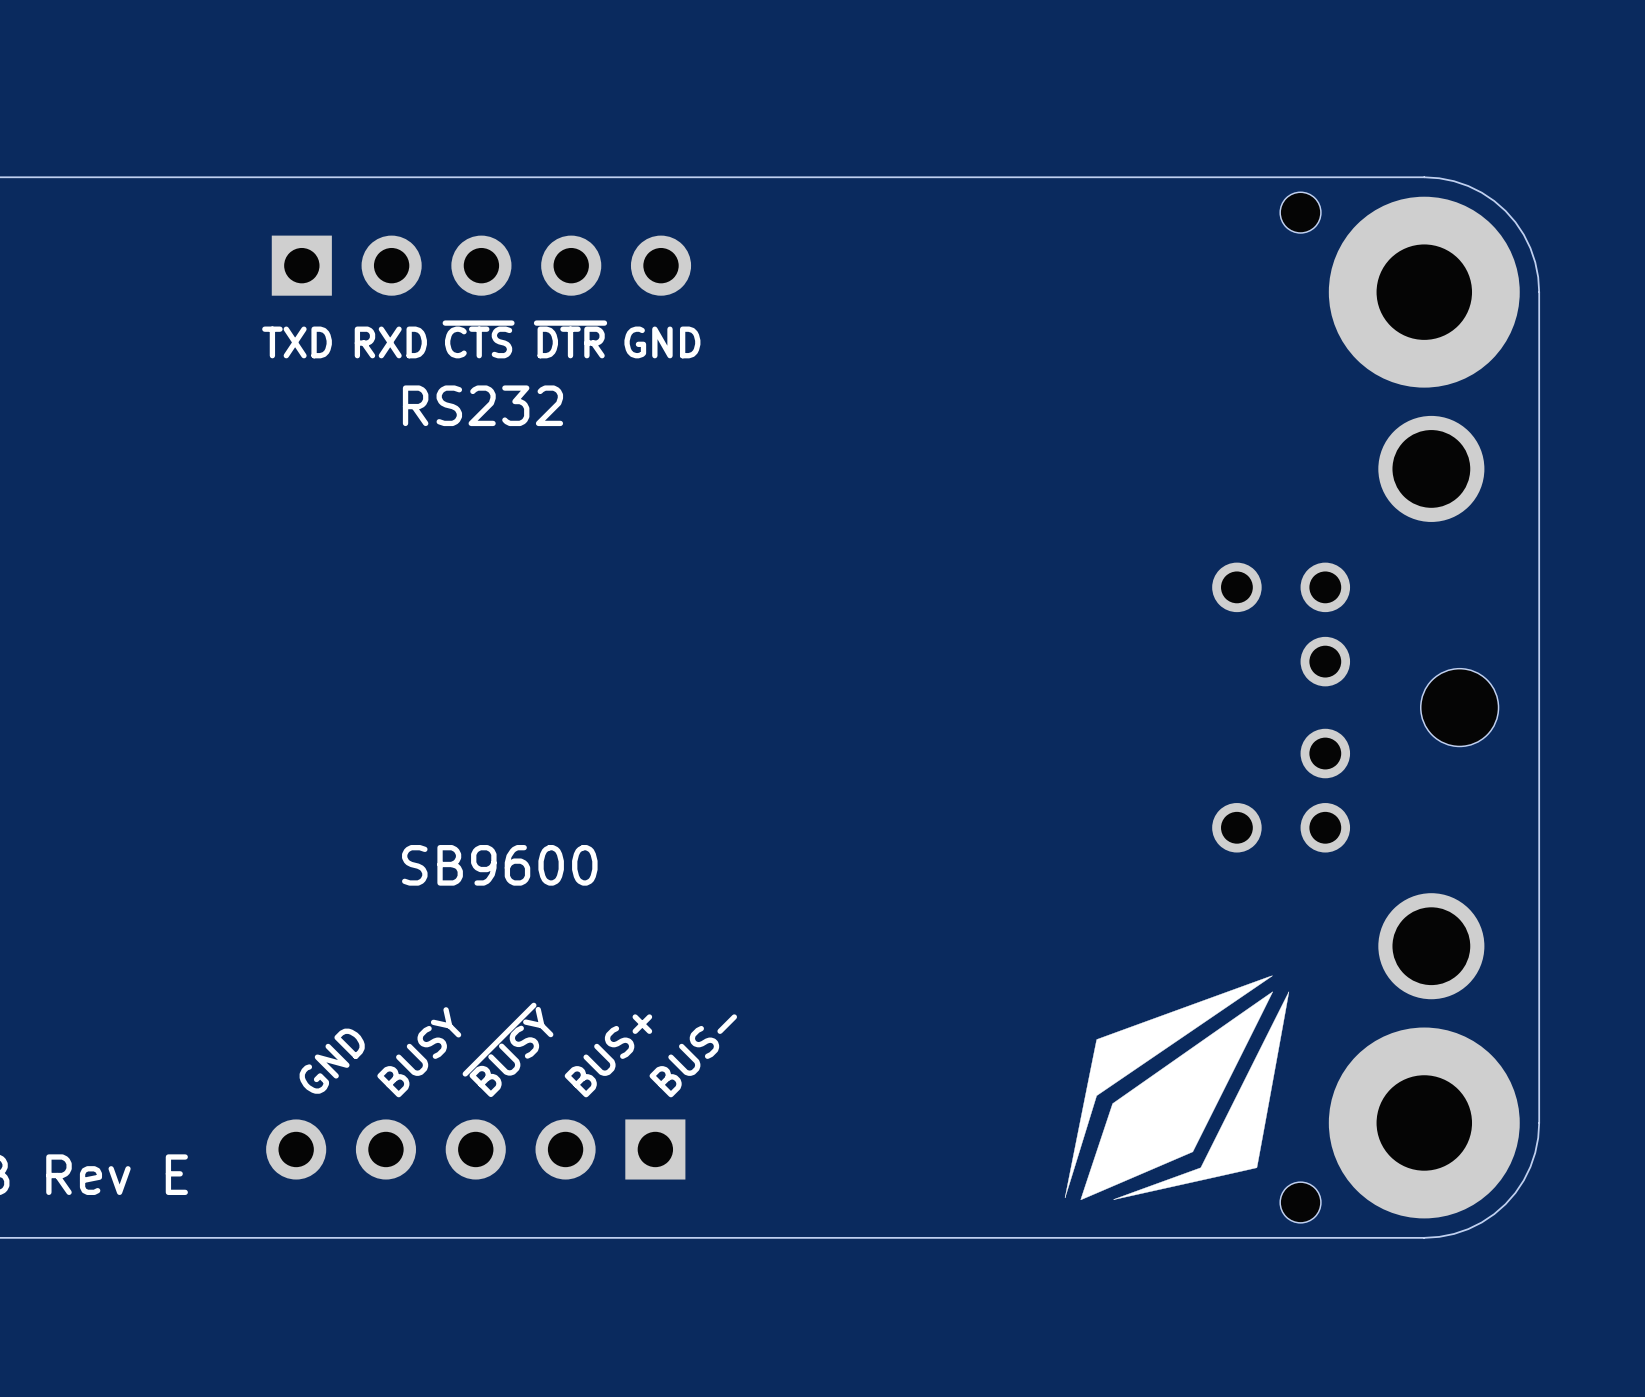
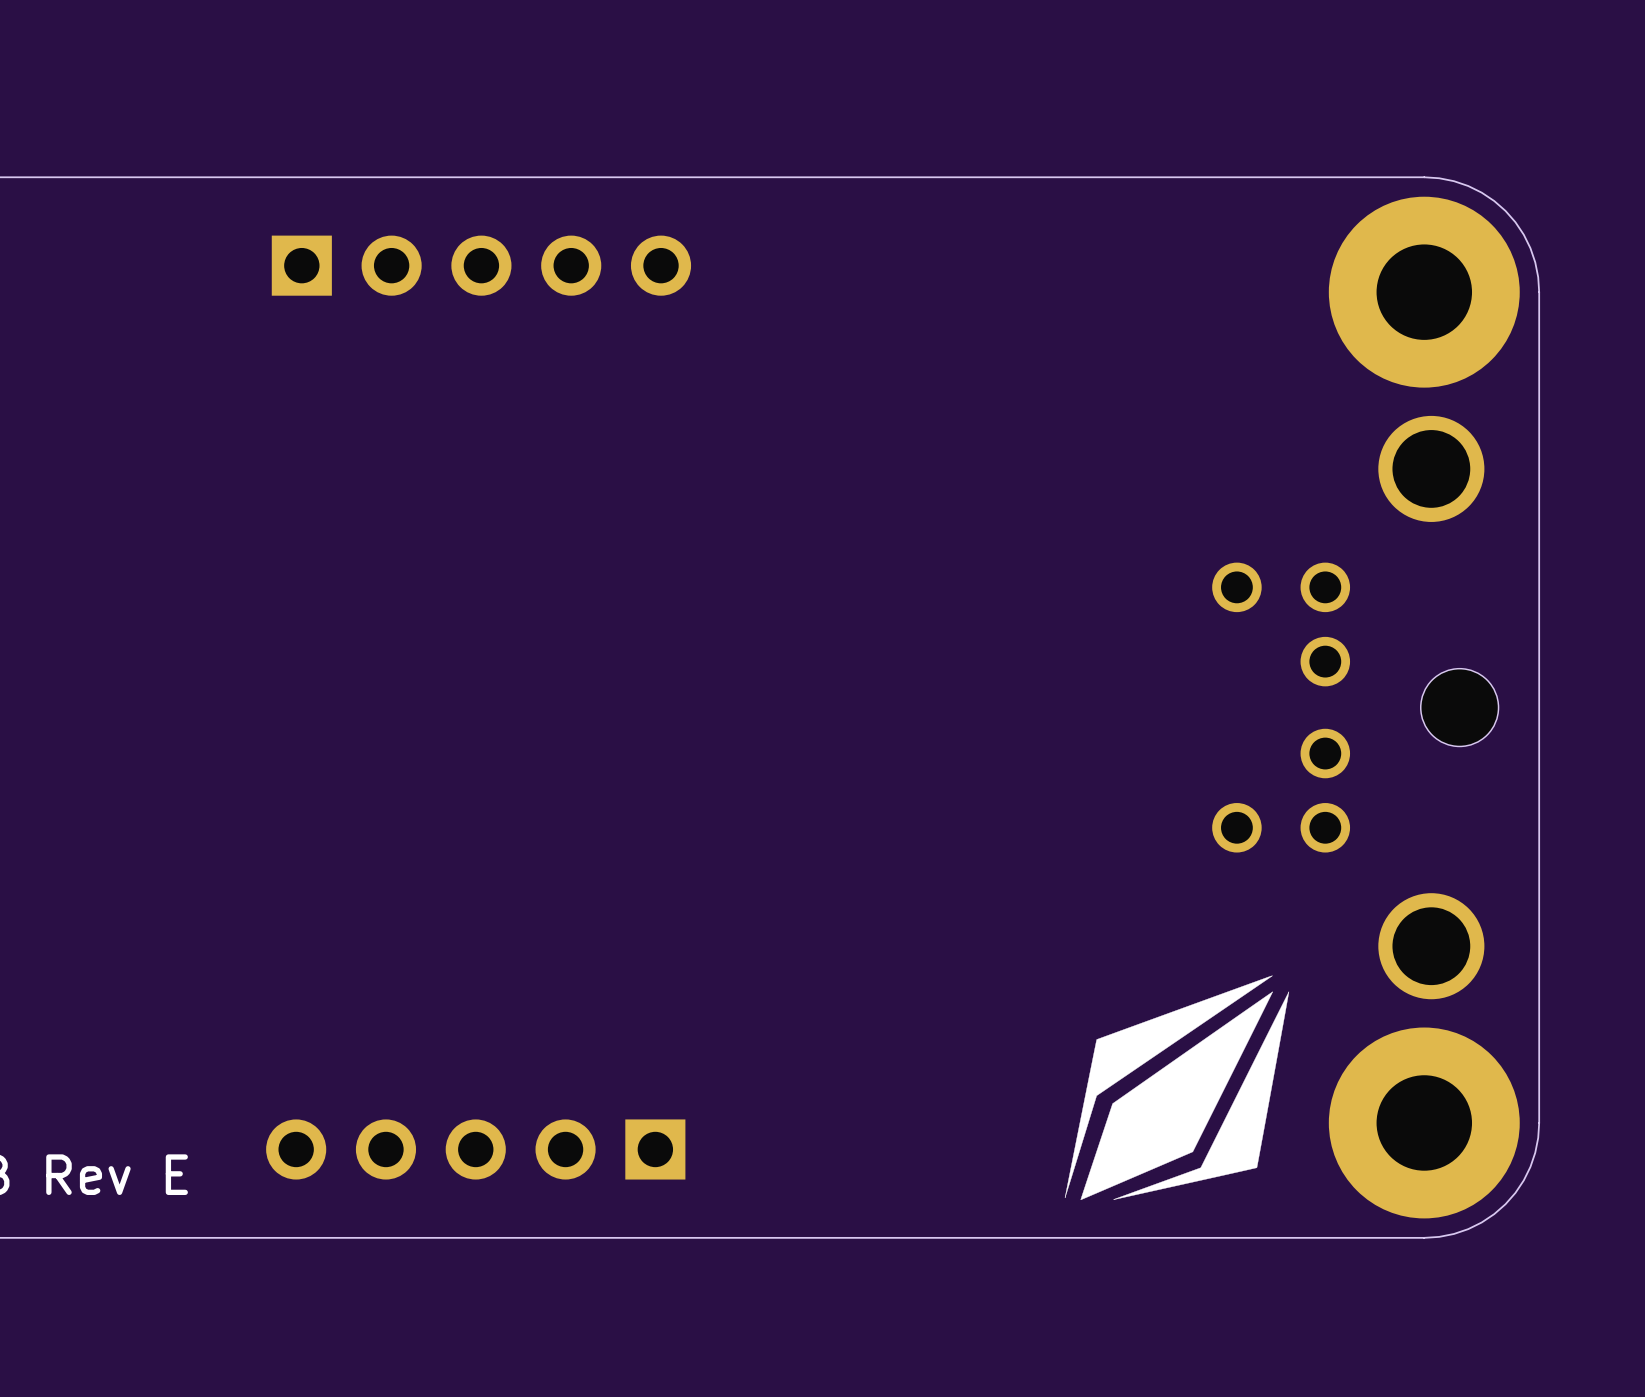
part: (1300, 212) -> none
text: ~{CTS} (478, 339) -> none
text: ~{DTR} (570, 339) -> none
text: TXD (297, 342) -> none
text: RXD (390, 342) -> none
text: GND (662, 342) -> none
text: RS232 (482, 405) -> none
text: SB9600 (499, 865) -> none
text: ~{BUSY} (508, 1049) -> none
text: BUSY (419, 1052) -> none
text: BUS+ (608, 1055) -> none
text: BUS- (693, 1055) -> none
text: GND (332, 1061) -> none
part: (1300, 1202) -> none

